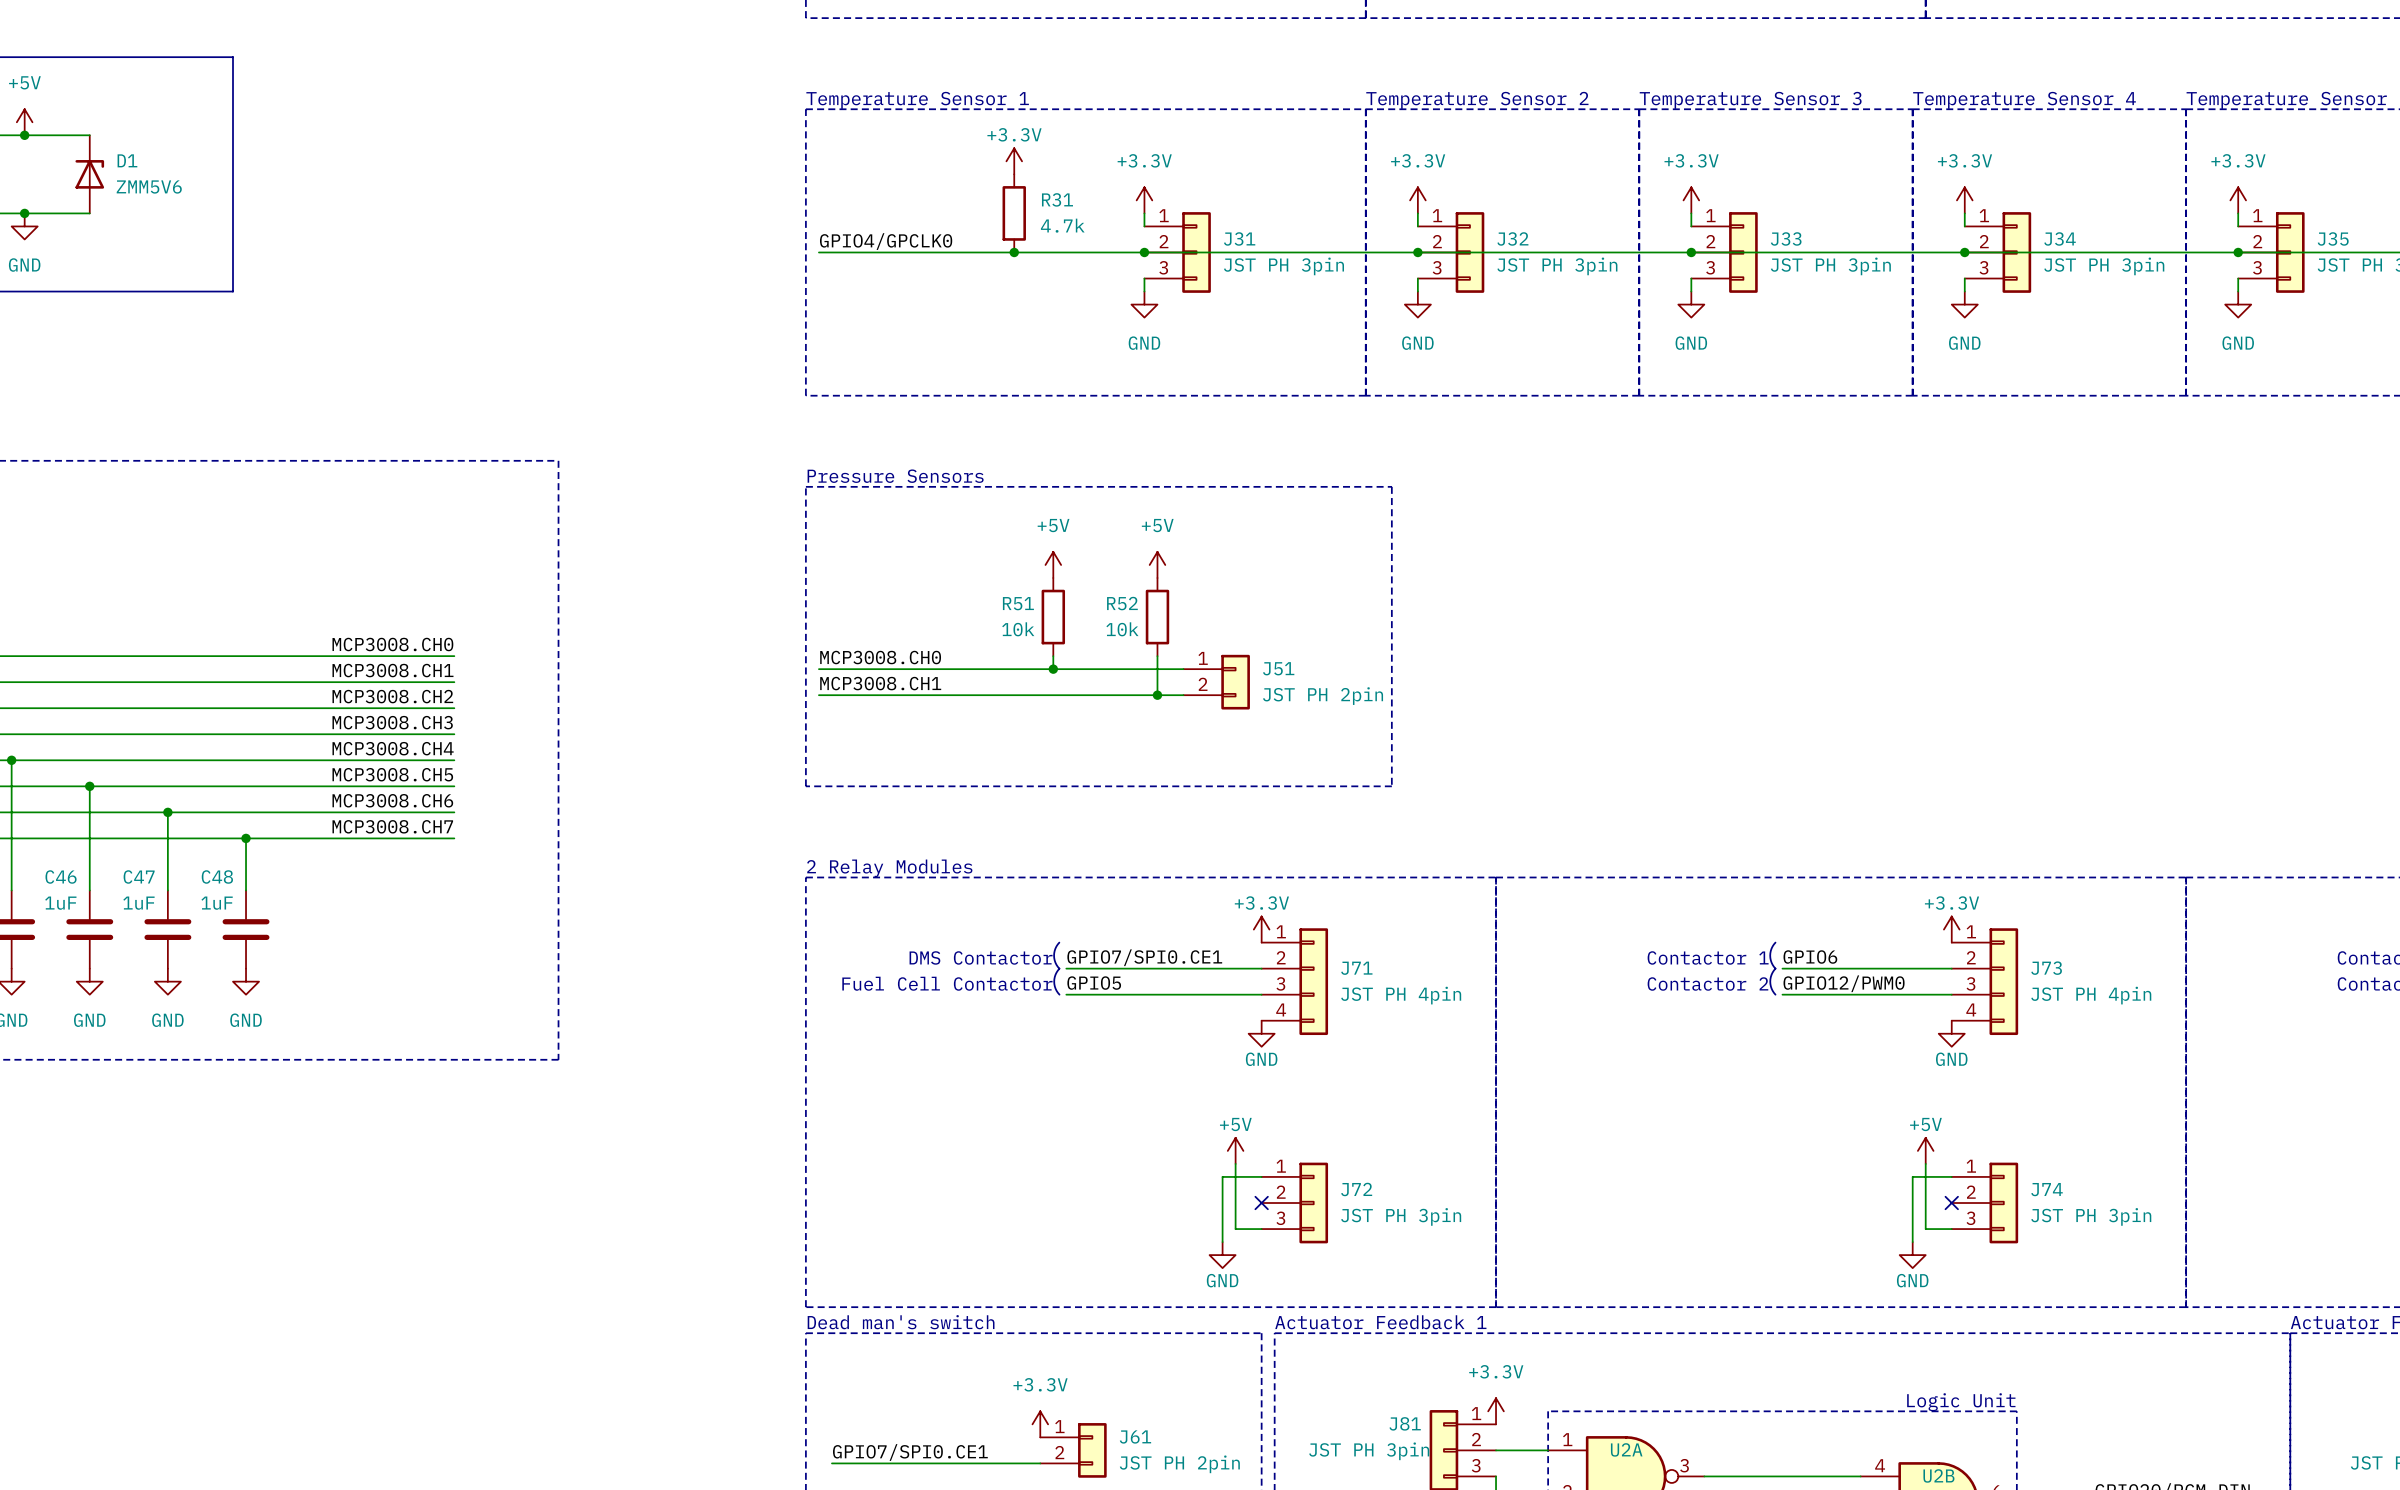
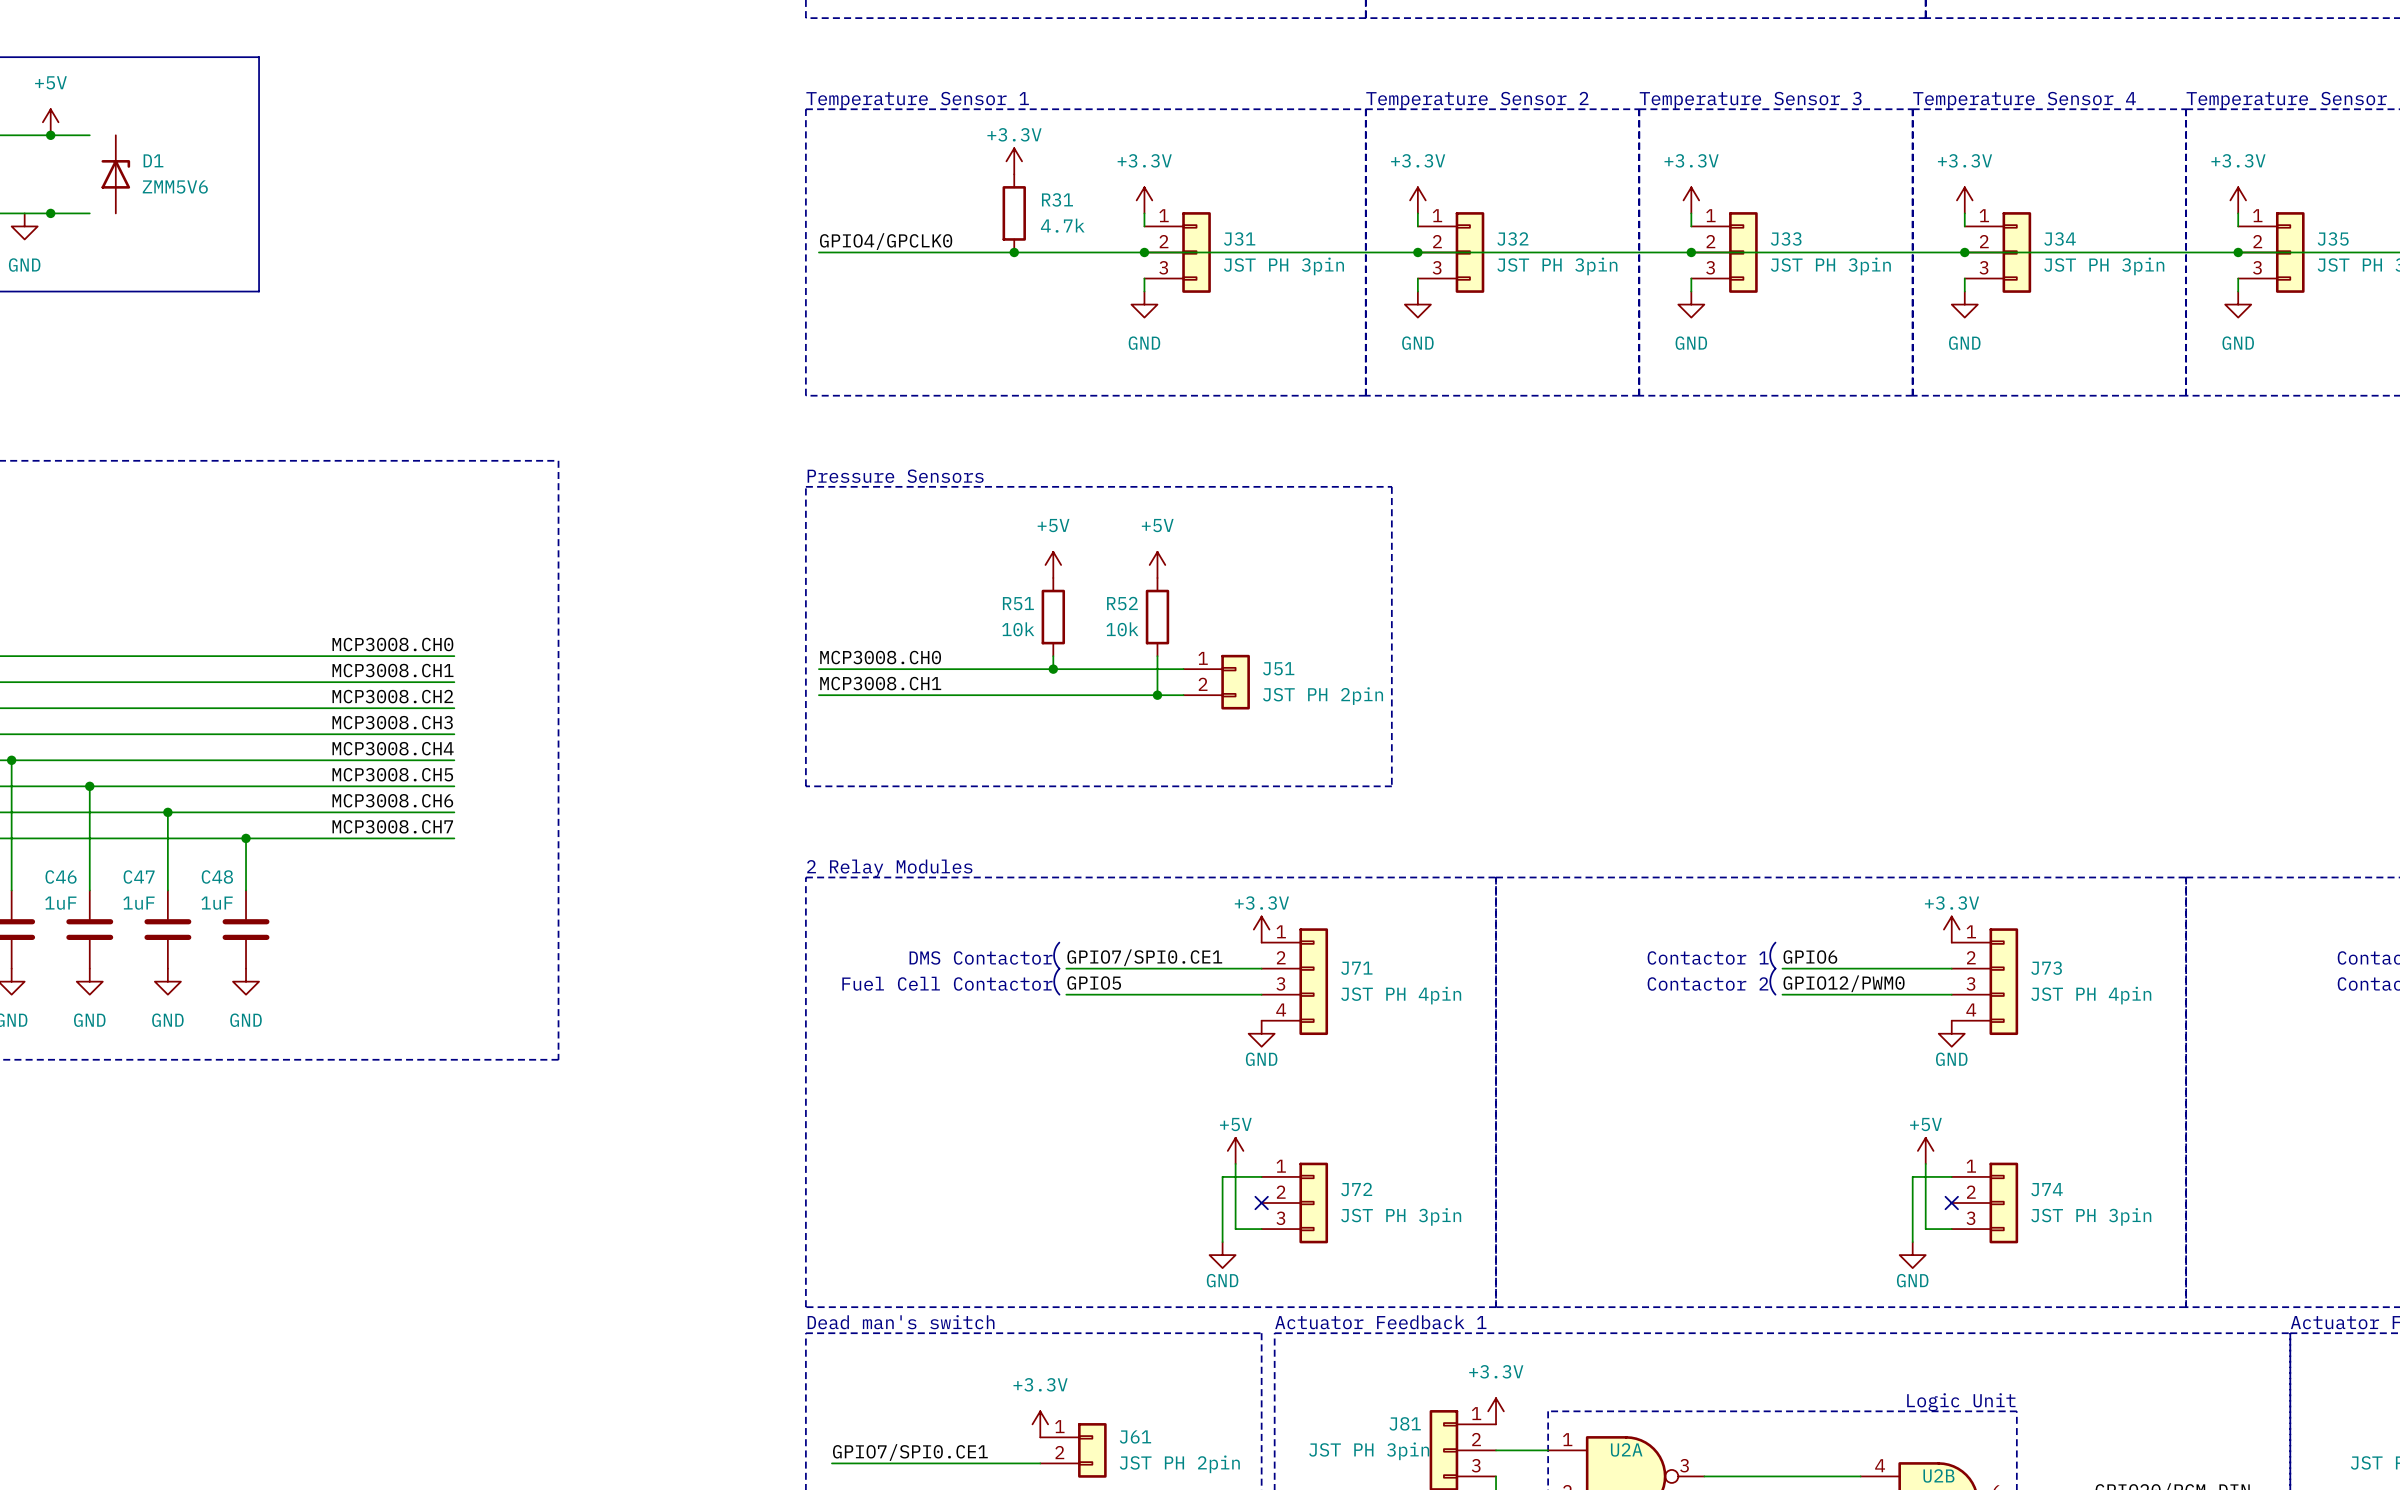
line: (232, 57) (232, 291) -> (232, 57) (259, 57) (259, 291) (232, 291)
power symbol position: +5V (24, 122) -> +5V (50, 122)
junction position: (24, 135) -> (50, 135)
D1 position: (89, 174) -> (115, 174)
junction position: (24, 213) -> (50, 213)

